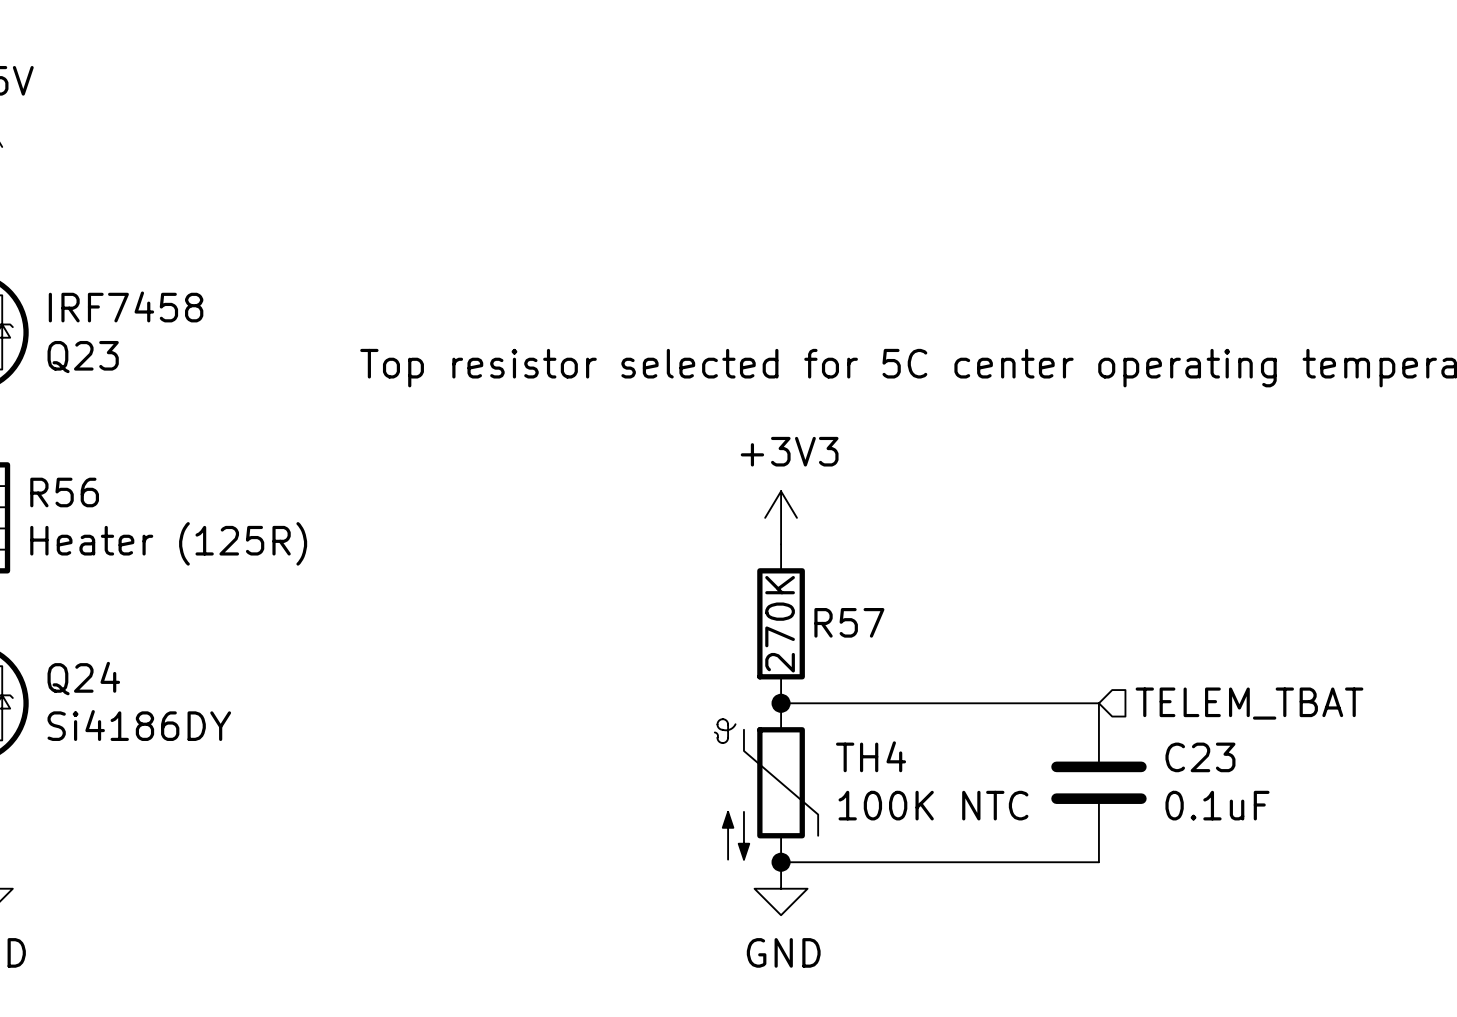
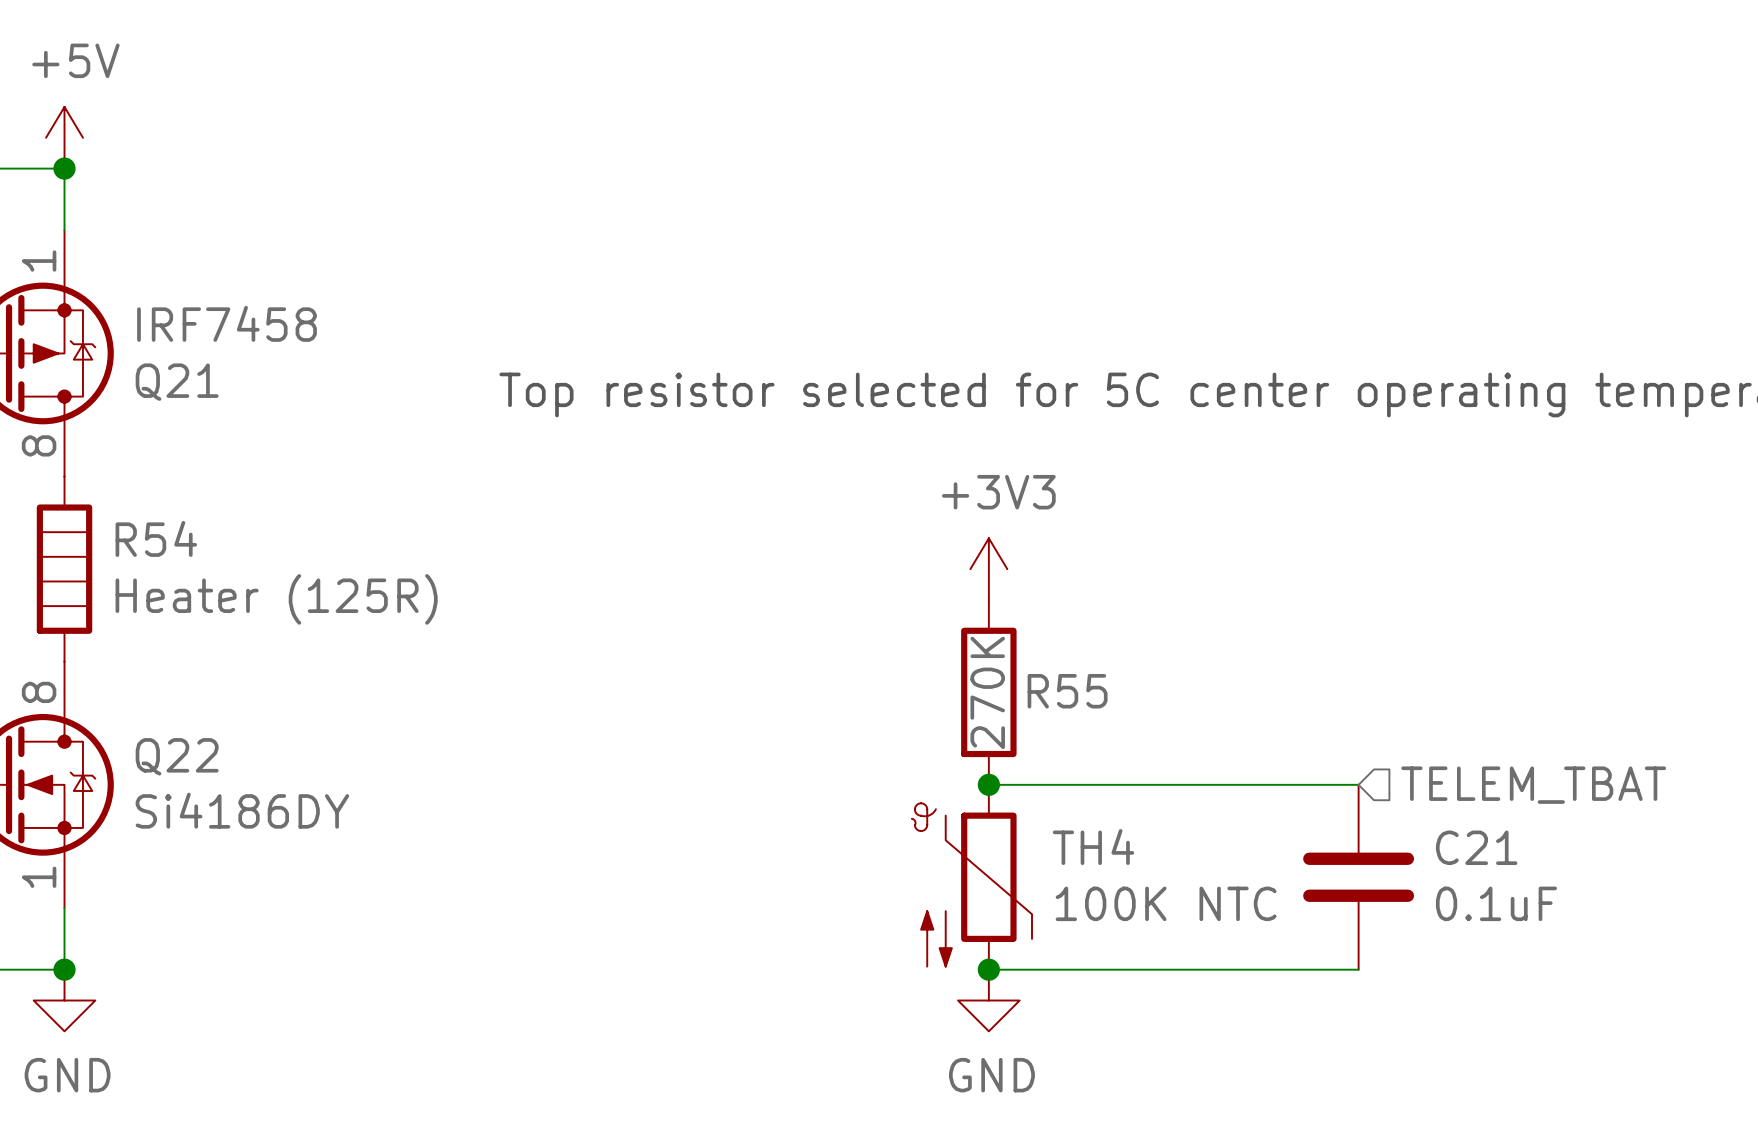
Q23 name: Q23 (83, 357) -> Q21 (177, 382)
R56 name: R56 (64, 492) -> R54 (156, 538)
R57 name: R57 (849, 622) -> R55 (1067, 691)
Q24 name: Q24 (83, 678) -> Q22 (177, 756)
C23 name: C23 (1200, 757) -> C21 (1476, 847)

